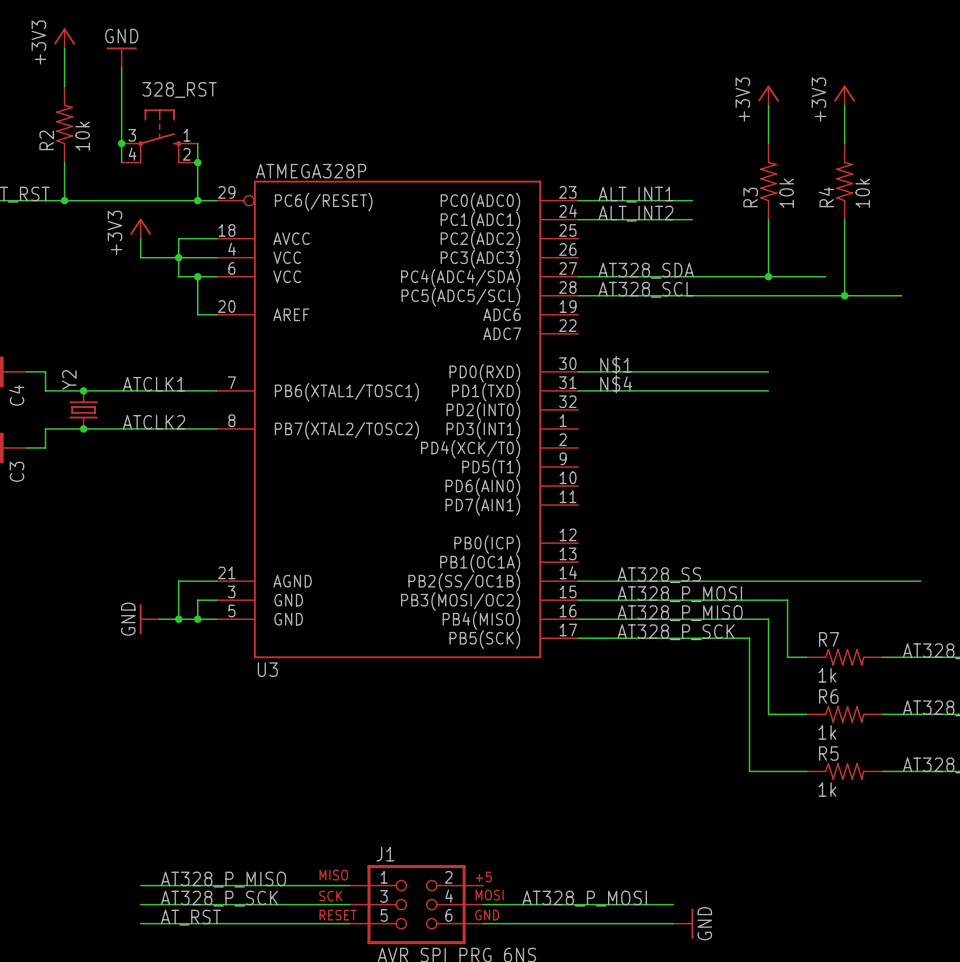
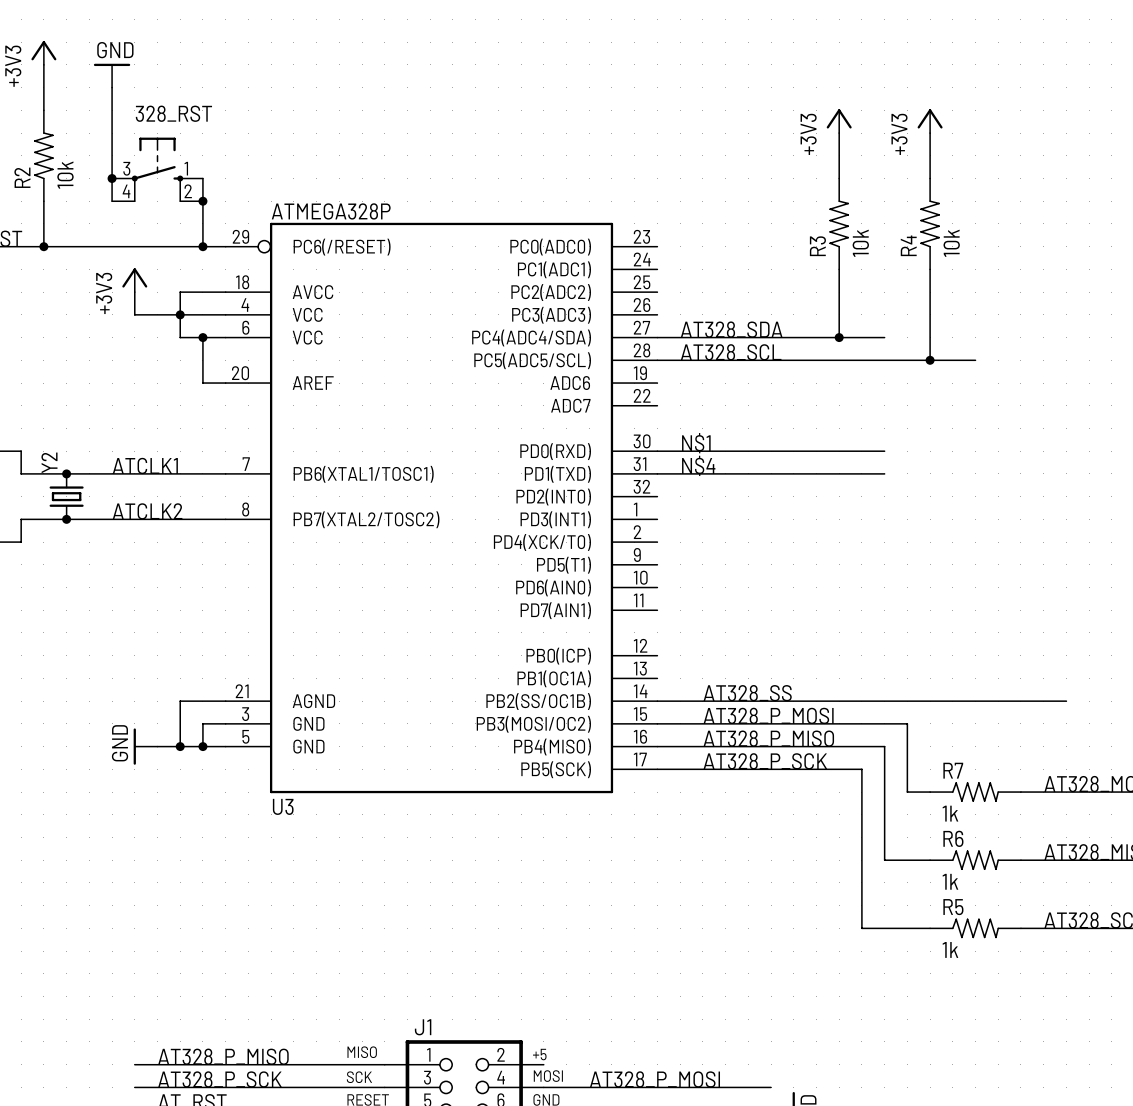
power symbol: none -> +3V3 (839, 121)
power symbol: +3V3 (768, 95) -> none
power symbol: none -> +3V3 (930, 121)
power symbol: +3V3 (844, 95) -> none
wire: (768, 105) (768, 143) -> (839, 133) (839, 178)
wire: (844, 105) (844, 143) -> (930, 133) (930, 178)
R3 position: (768, 181) -> (839, 223)
R4 position: (844, 181) -> (930, 223)
label: ALT_INT1 (635, 194) -> none
wire: (578, 200) (692, 200) -> none
label: ALT_INT2 (635, 213) -> none
wire: (578, 219) (692, 219) -> none
wire: none -> (839, 269) (839, 337)
wire: (768, 219) (768, 276) (825, 276) -> none
wire: none -> (930, 269) (930, 360)
wire: (844, 219) (844, 295) (901, 295) -> none
junction: none -> (839, 337)
junction: (768, 276) -> none
junction: none -> (930, 360)
junction: (844, 295) -> none

